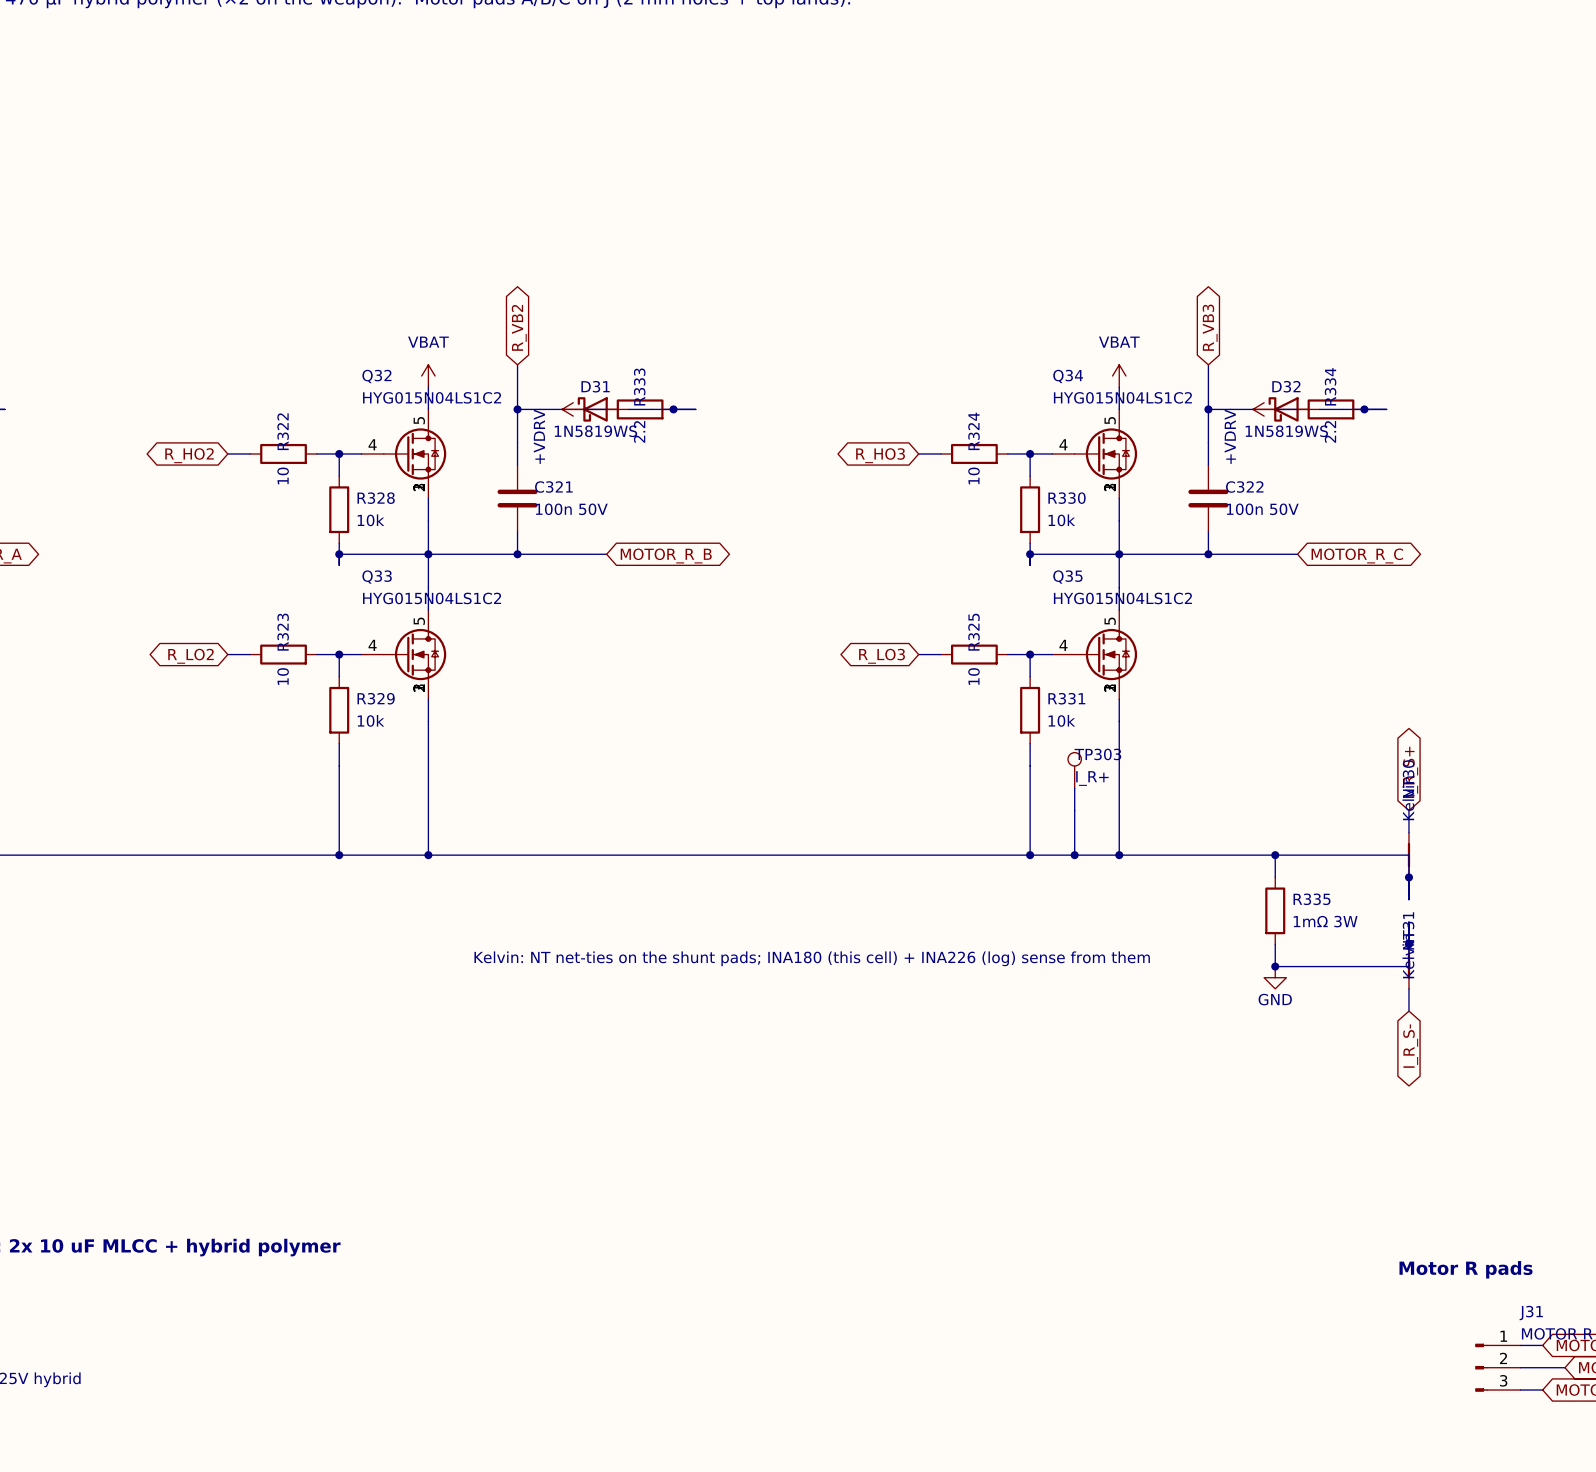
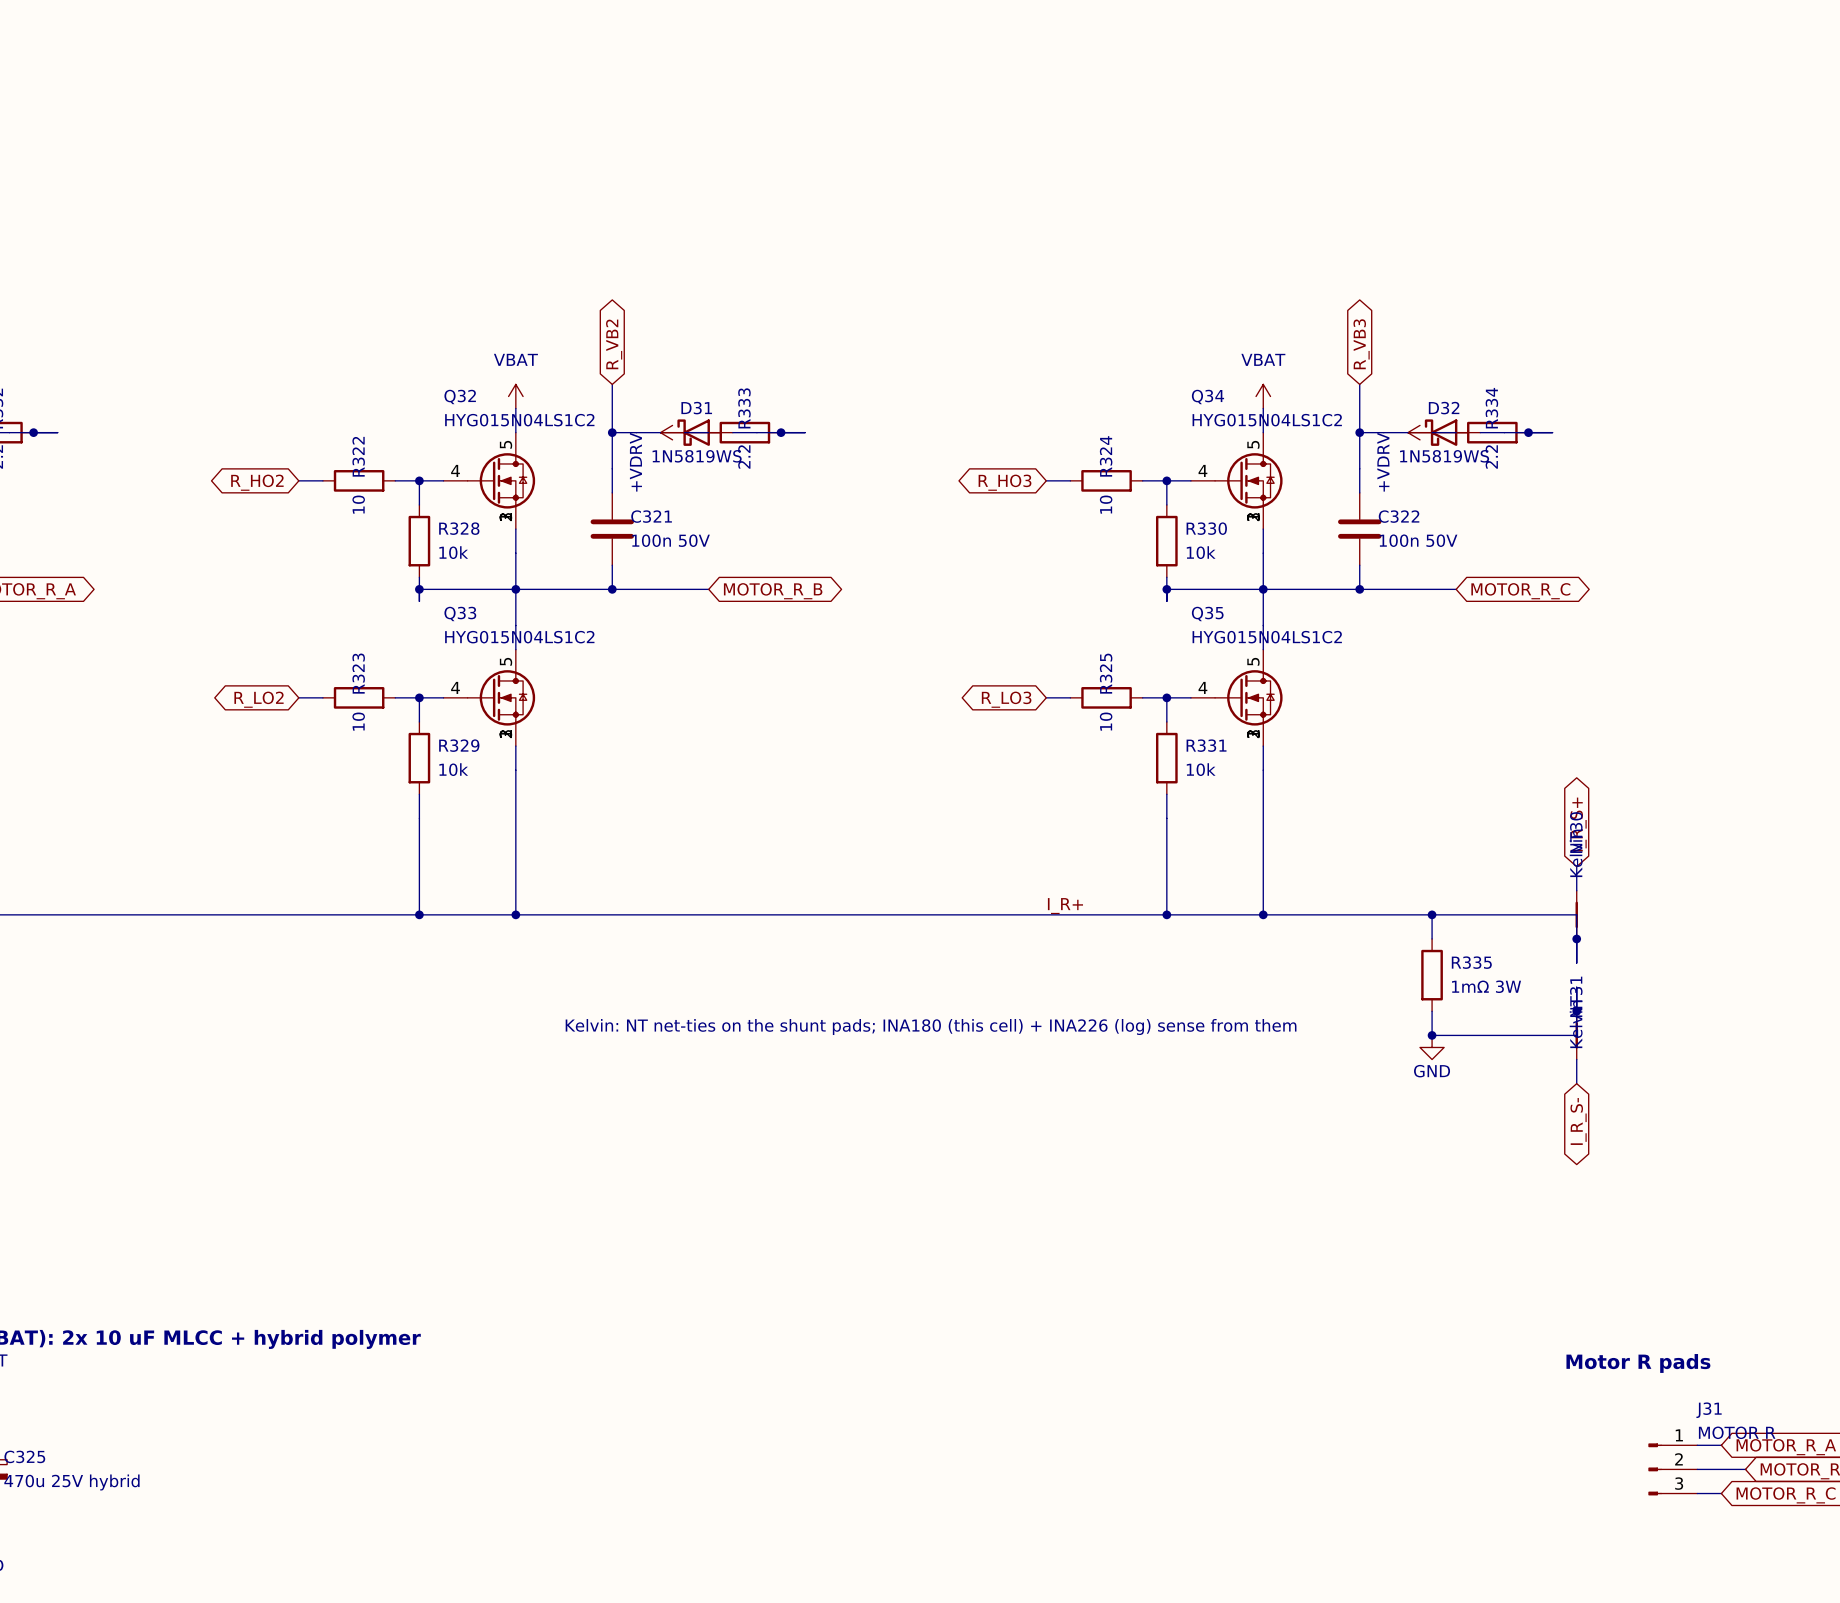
TP303: I_R+ (1074, 770) -> none
wire: (1074, 788) (1074, 855) -> none
label: none -> I_R+ (1065, 906)
junction: (1074, 855) -> none

